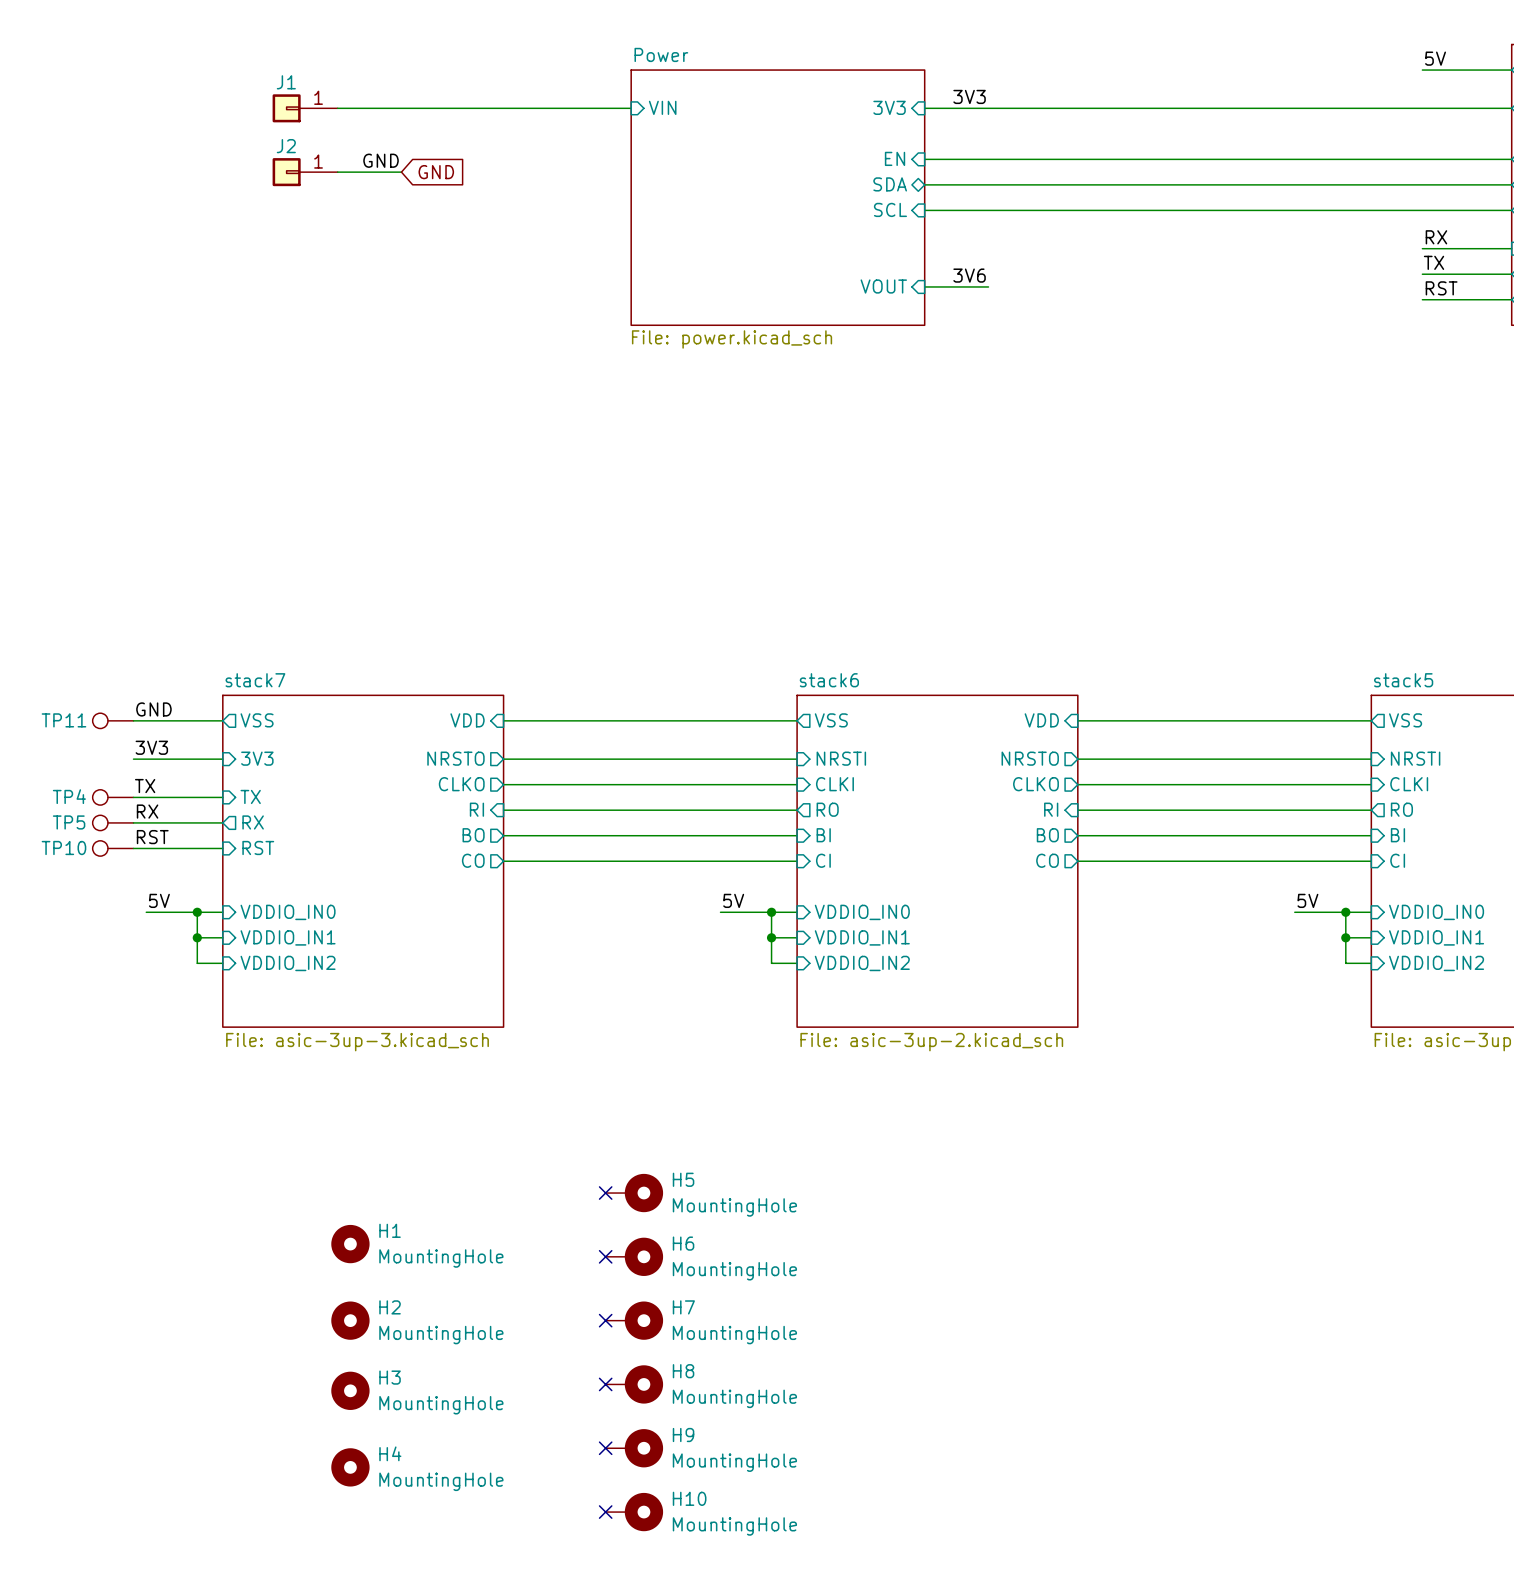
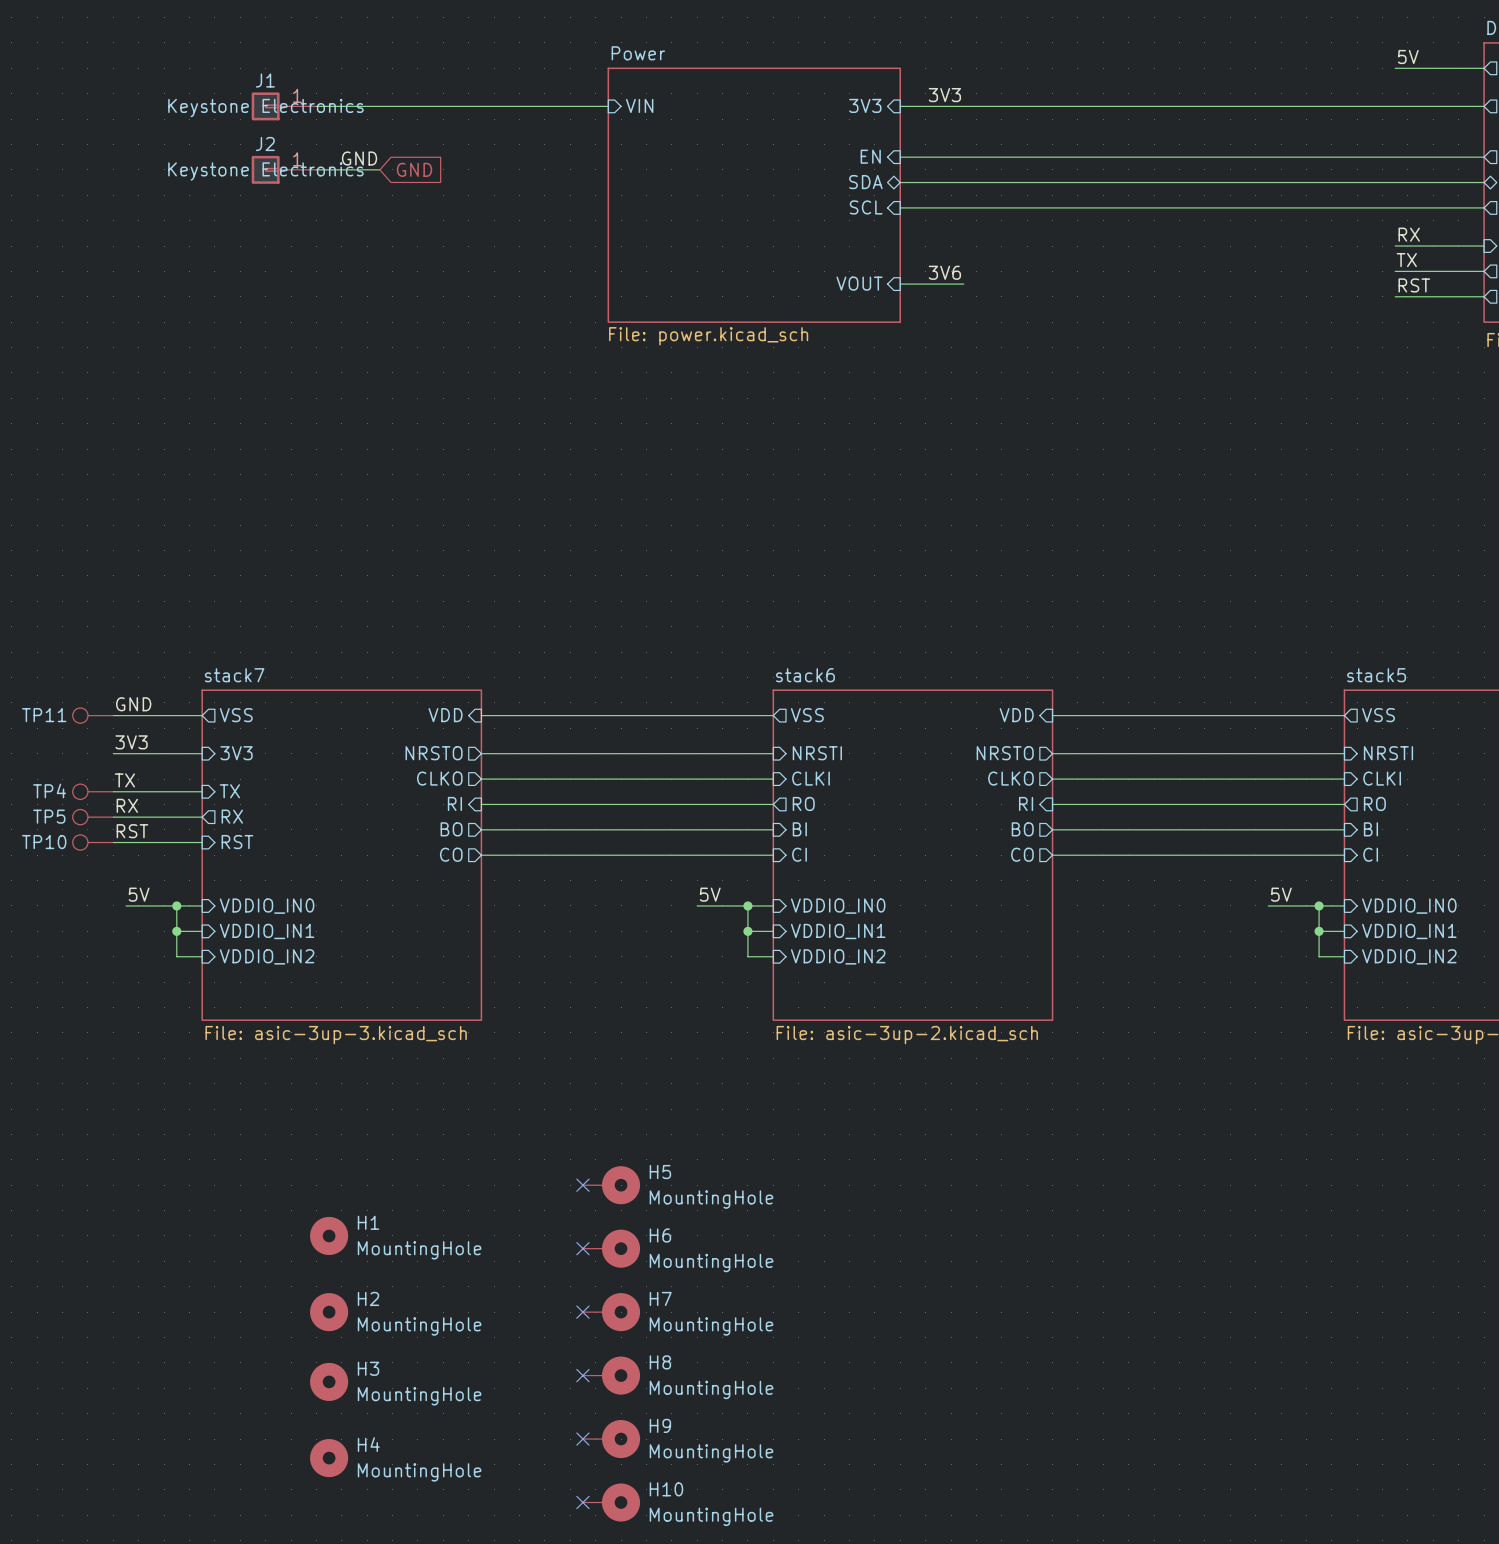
J1 text: none -> Keystone Electronics (265, 108)
J2 text: none -> Keystone Electronics (265, 171)

